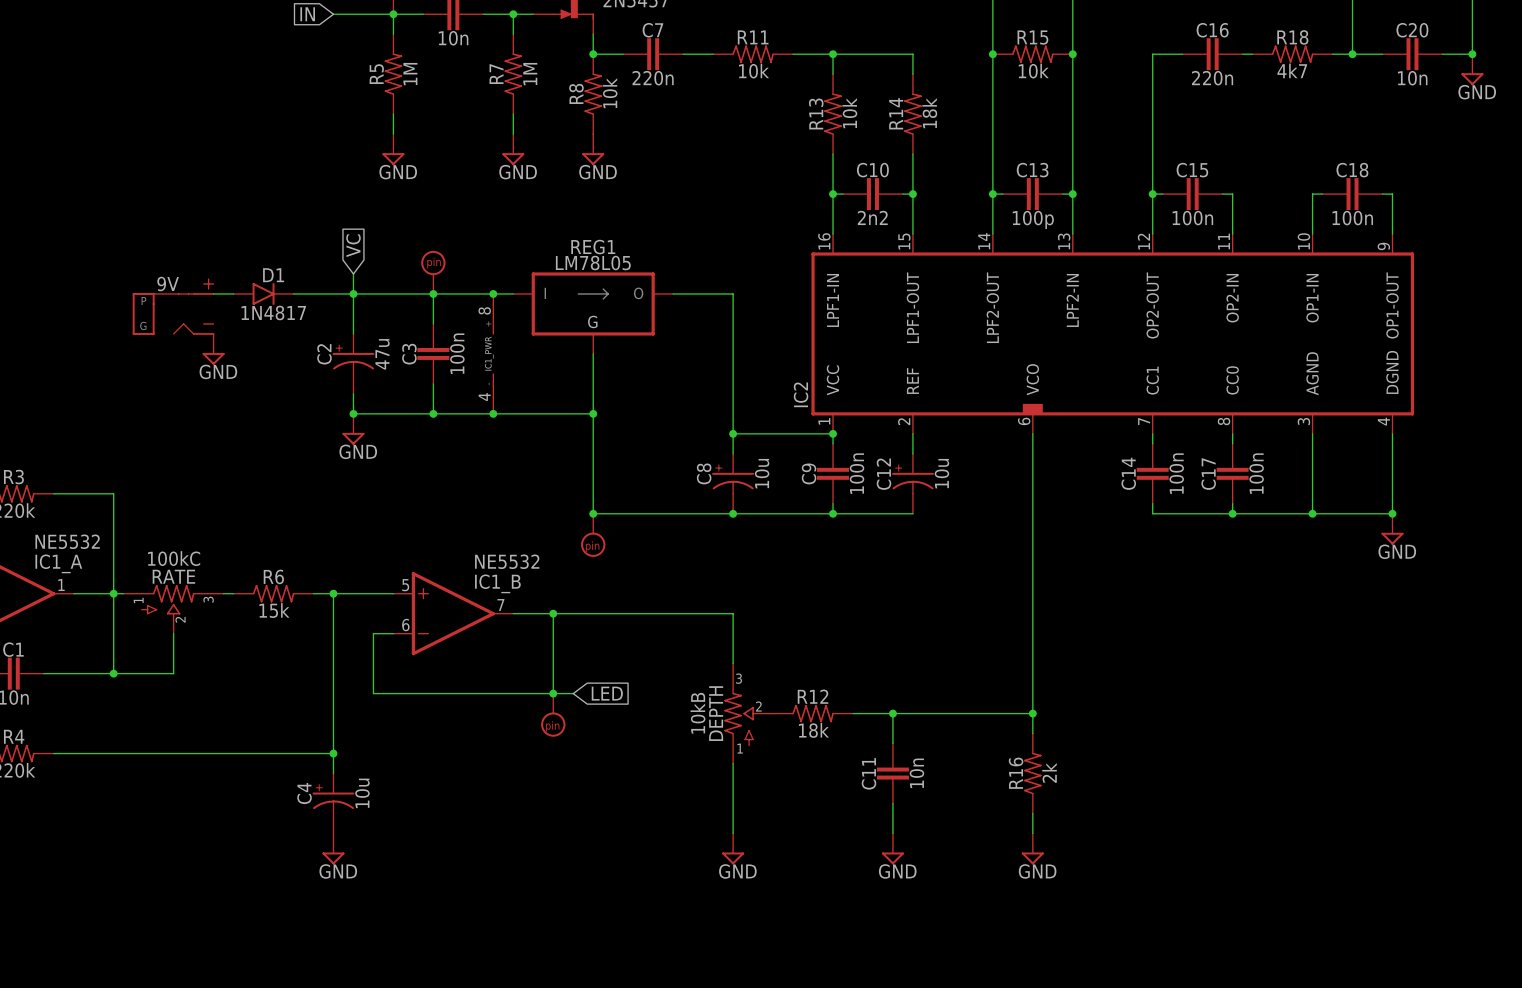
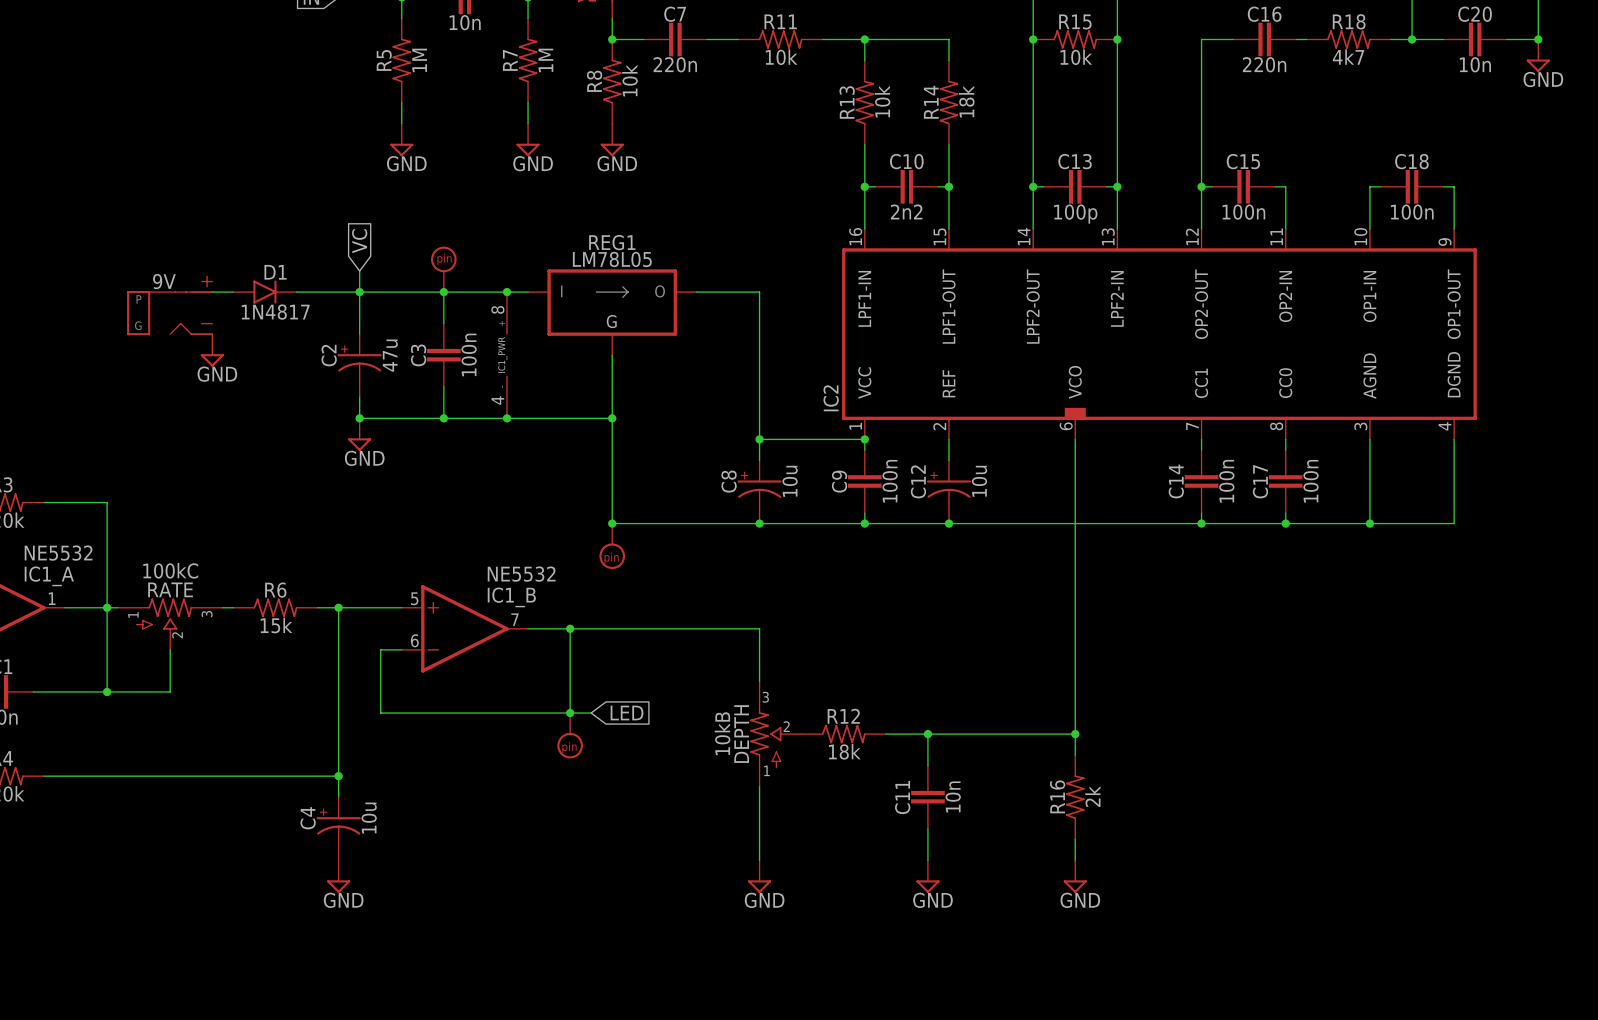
wire: none -> (948, 523) (1201, 523)
junction: none -> (948, 523)
junction: none -> (1201, 523)
junction: (1392, 513) -> none
power symbol: GND (1392, 529) -> none

